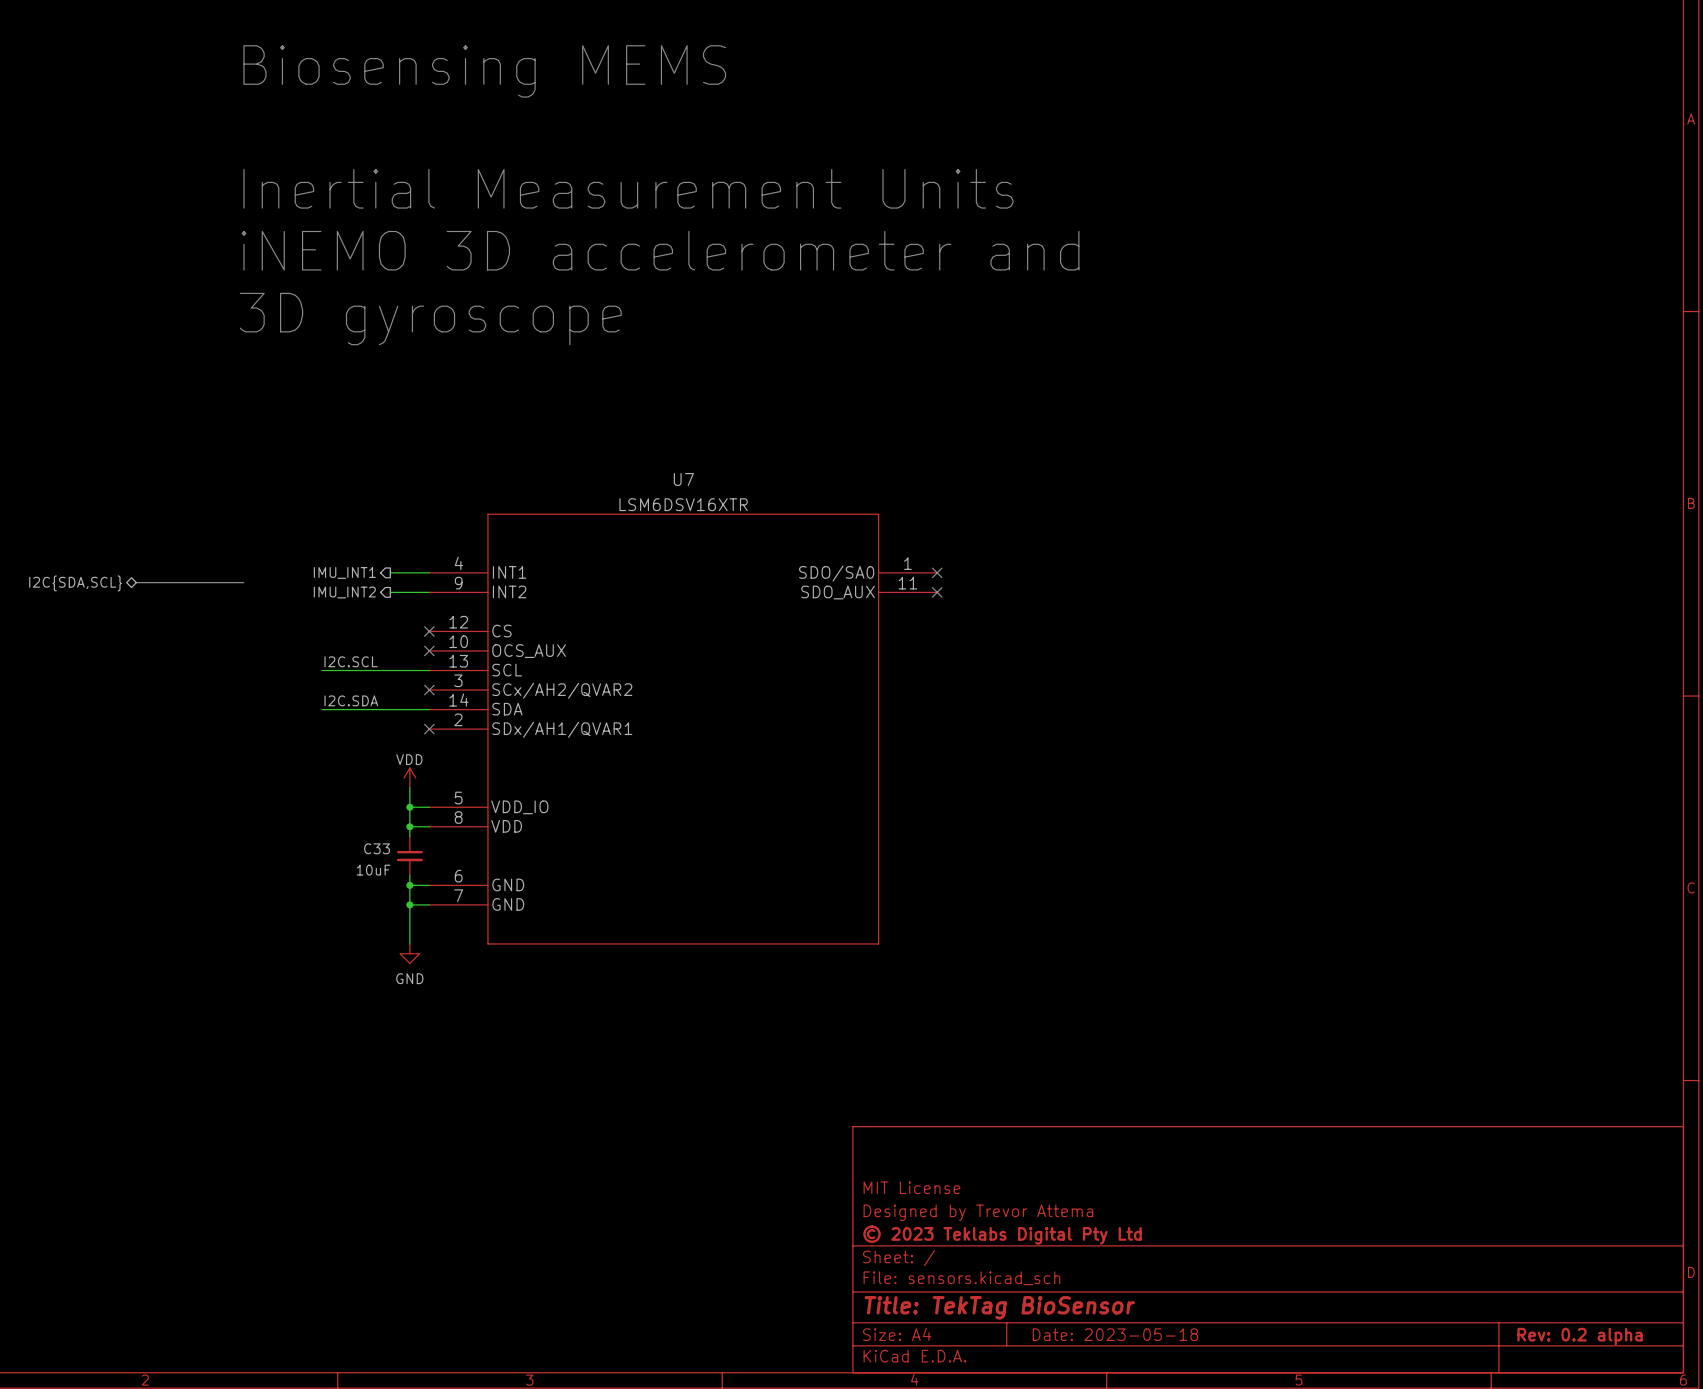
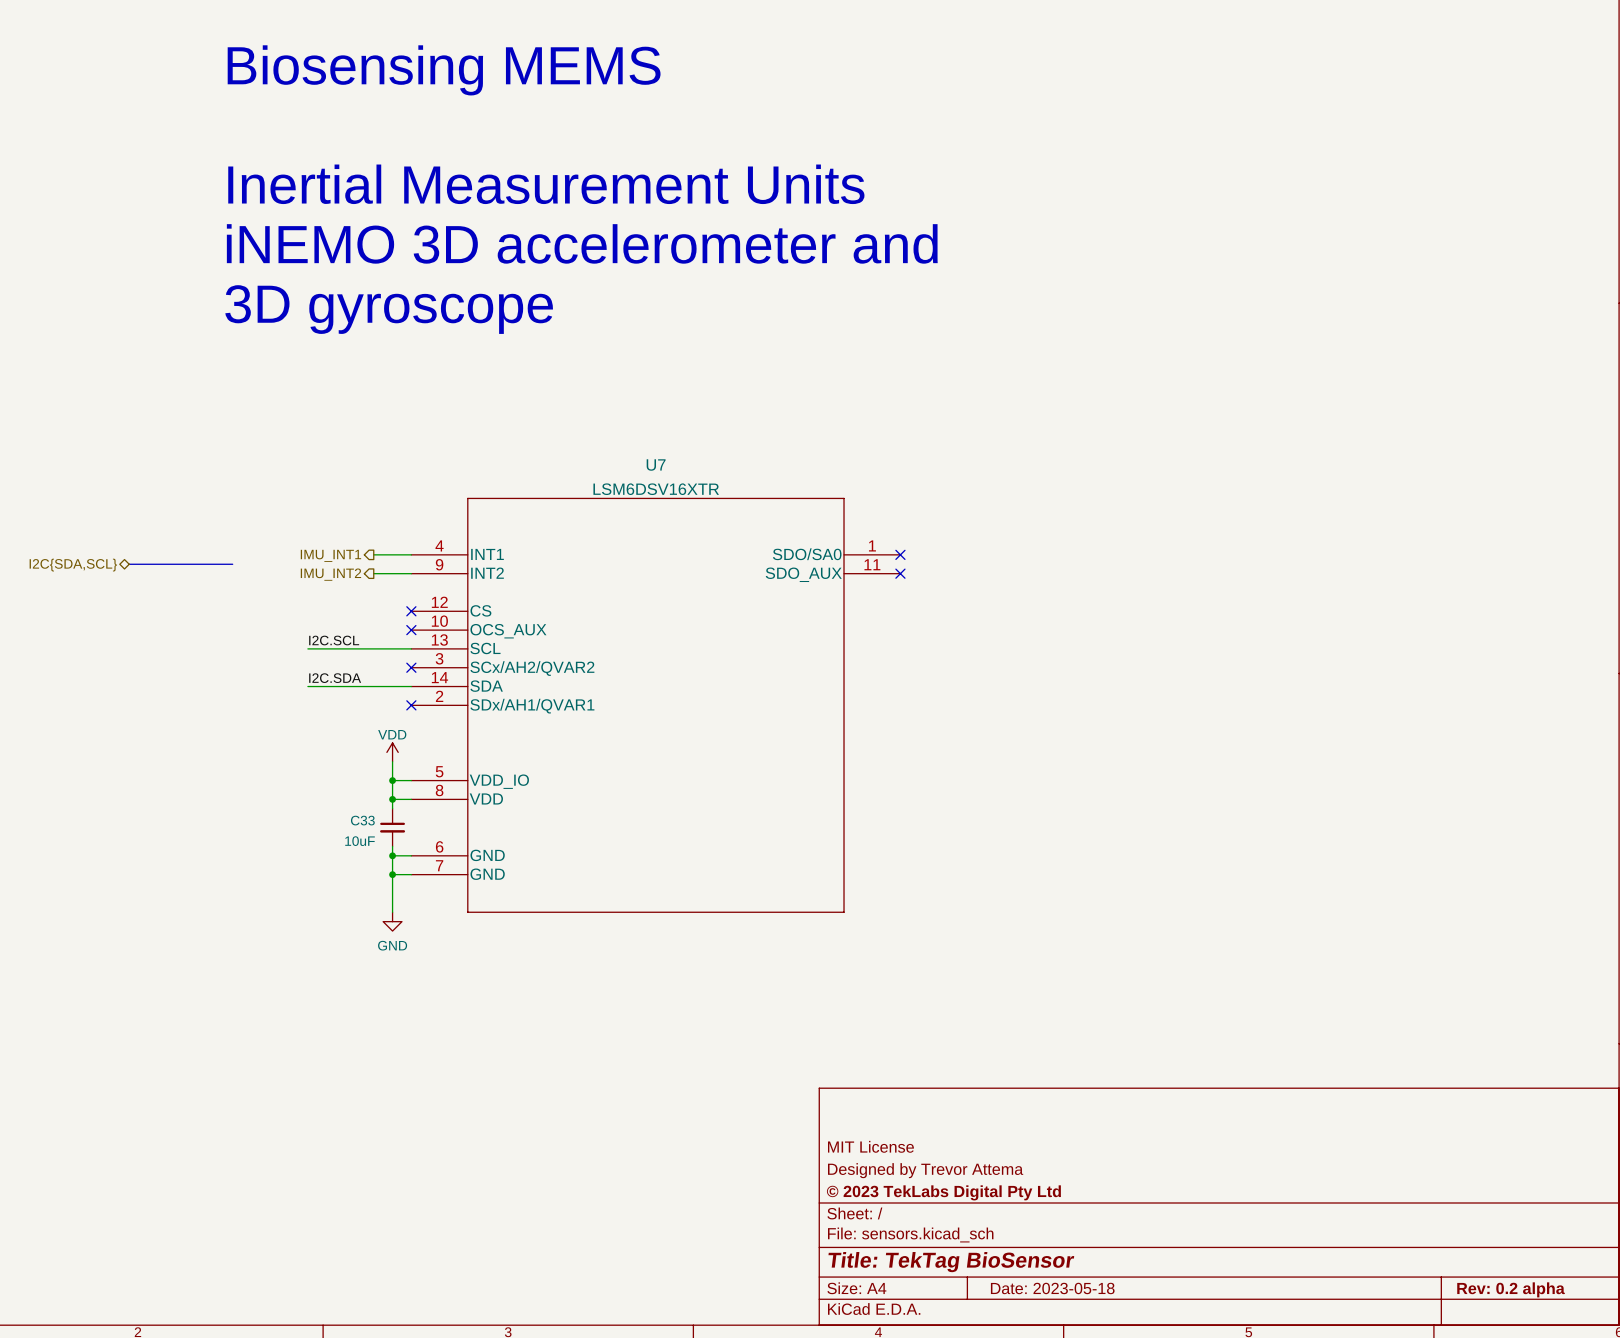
title block: © 2023 Teklabs Digital Pty Ltd (1002, 1235) -> © 2023 TekLabs Digital Pty Ltd (943, 1192)

